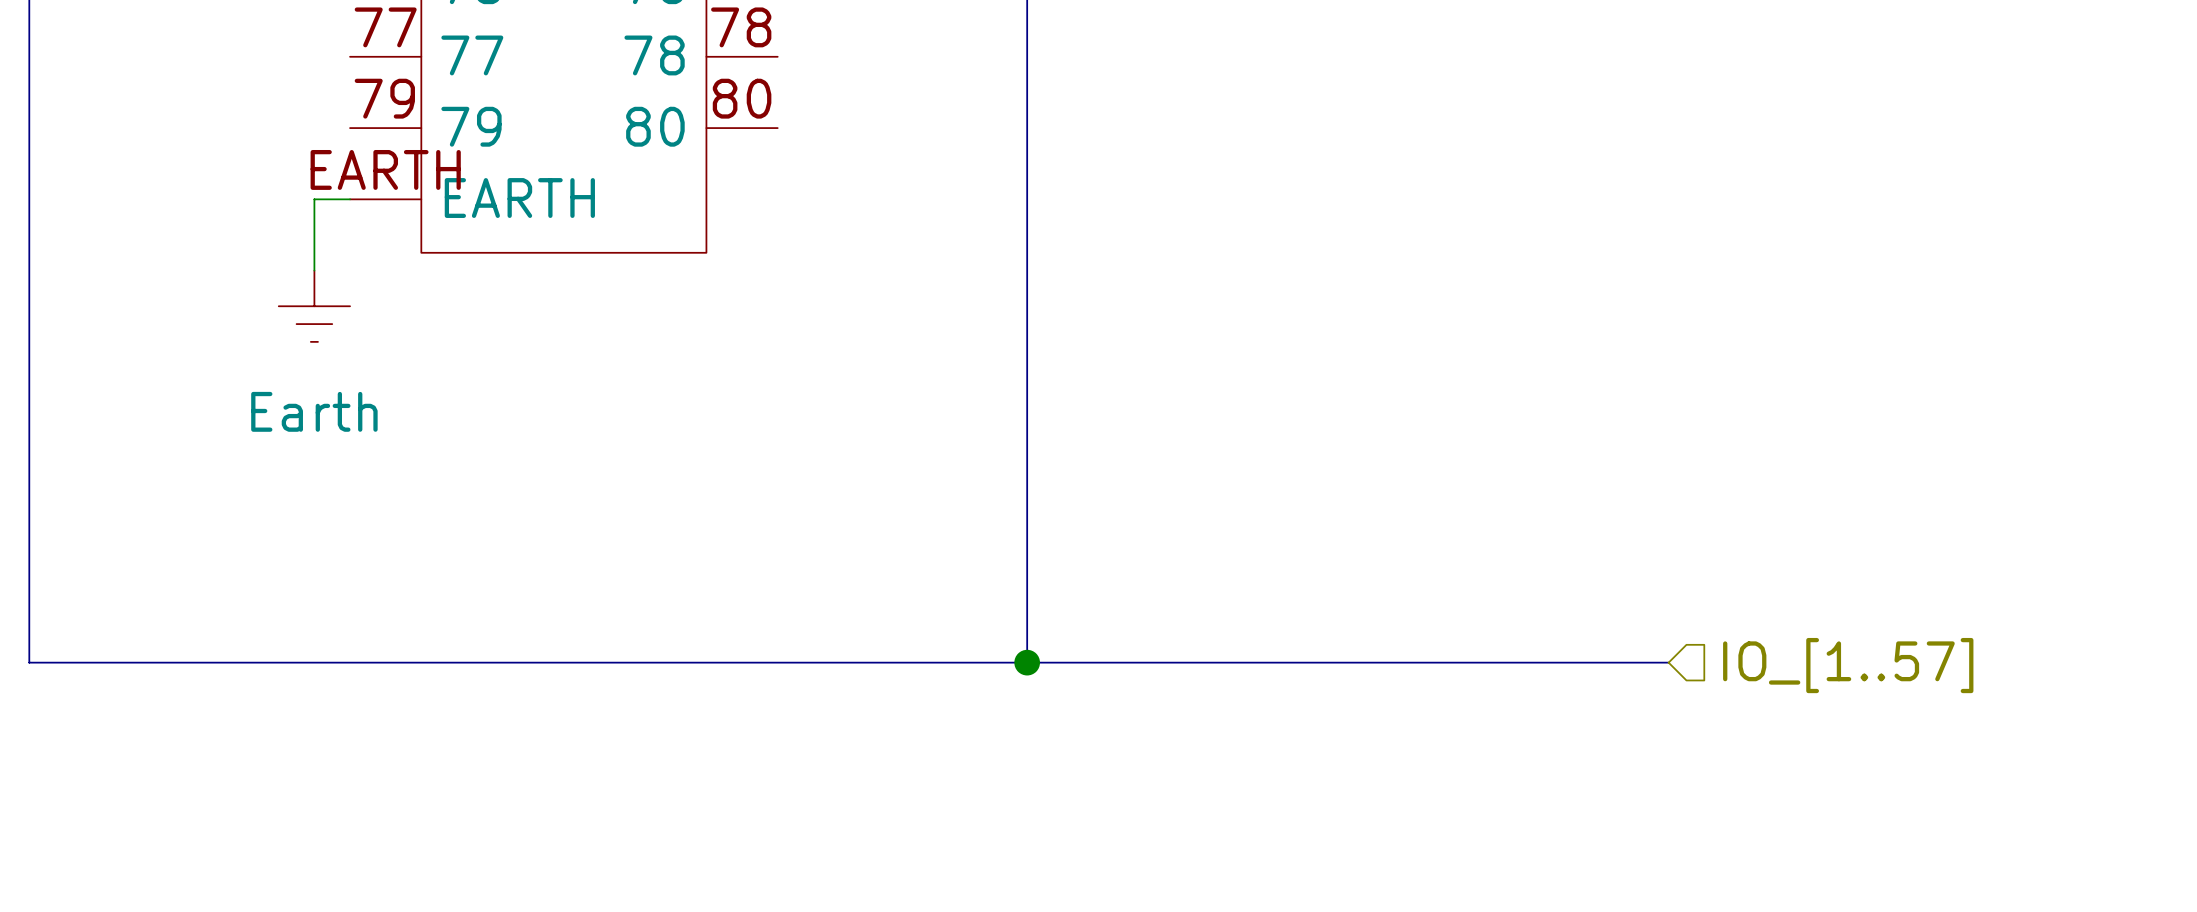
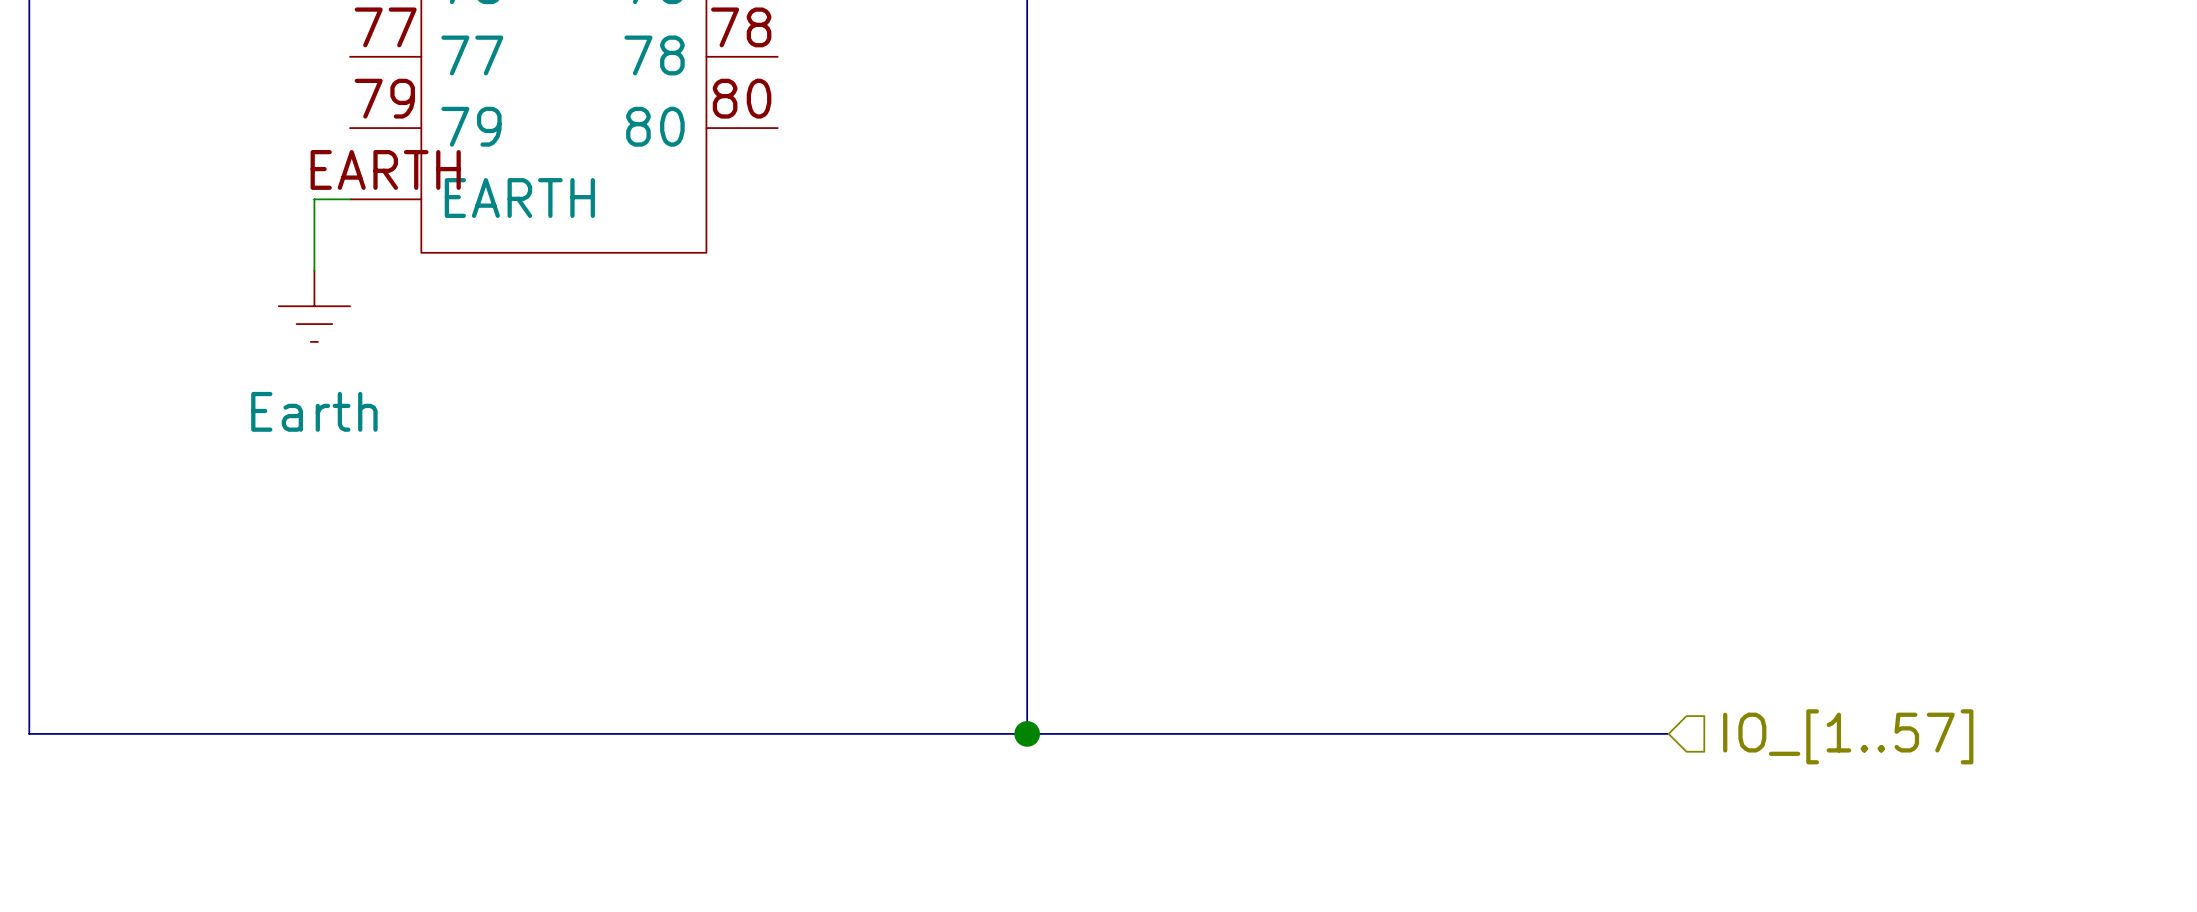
bus: (29, 662) (1668, 662) -> (29, 662) (29, 733) (1668, 733)
bus: none -> (1027, 662) (1027, 733)
junction position: (1027, 662) -> (1027, 733)
hierarchical label position: IO_[1..57] (1848, 665) -> IO_[1..57] (1848, 736)

